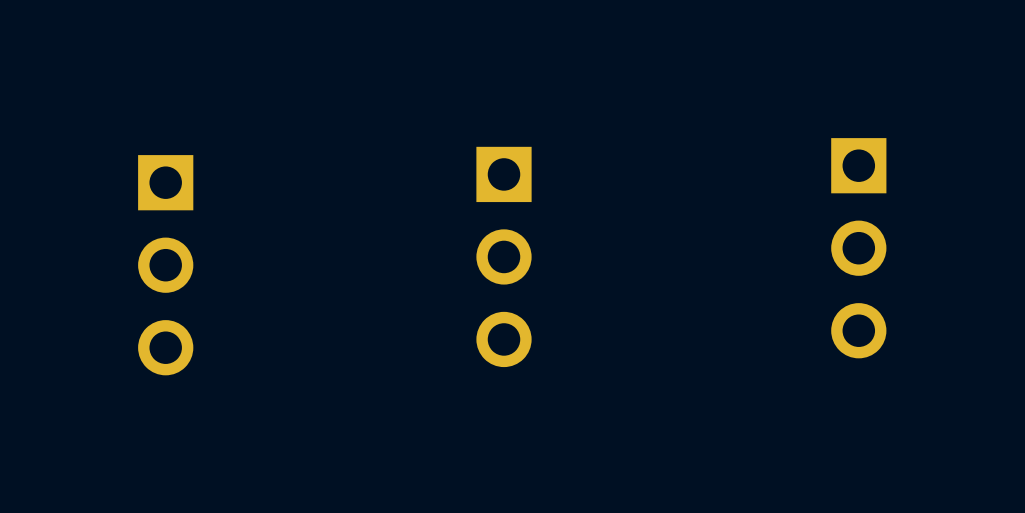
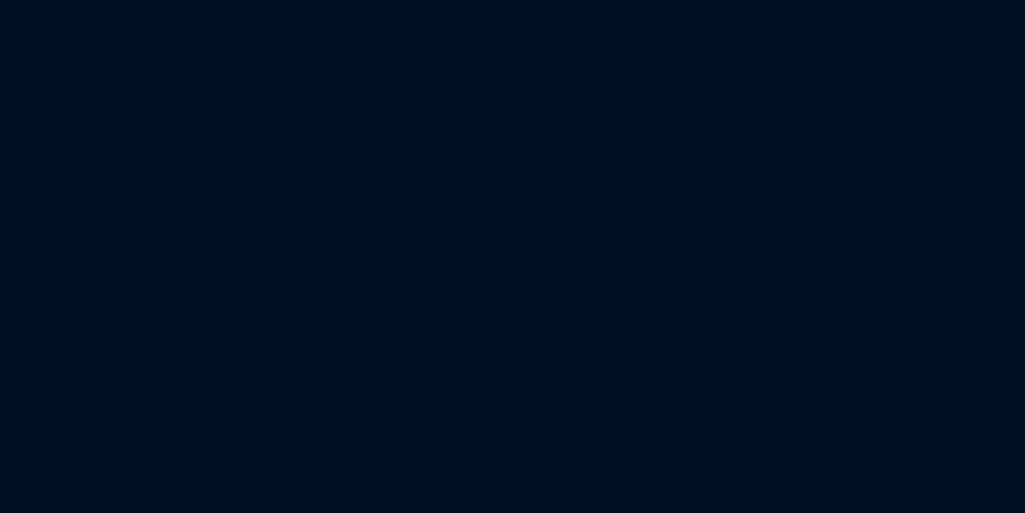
part: (858, 248) -> none
part: (504, 256) -> none
part: (165, 265) -> none

